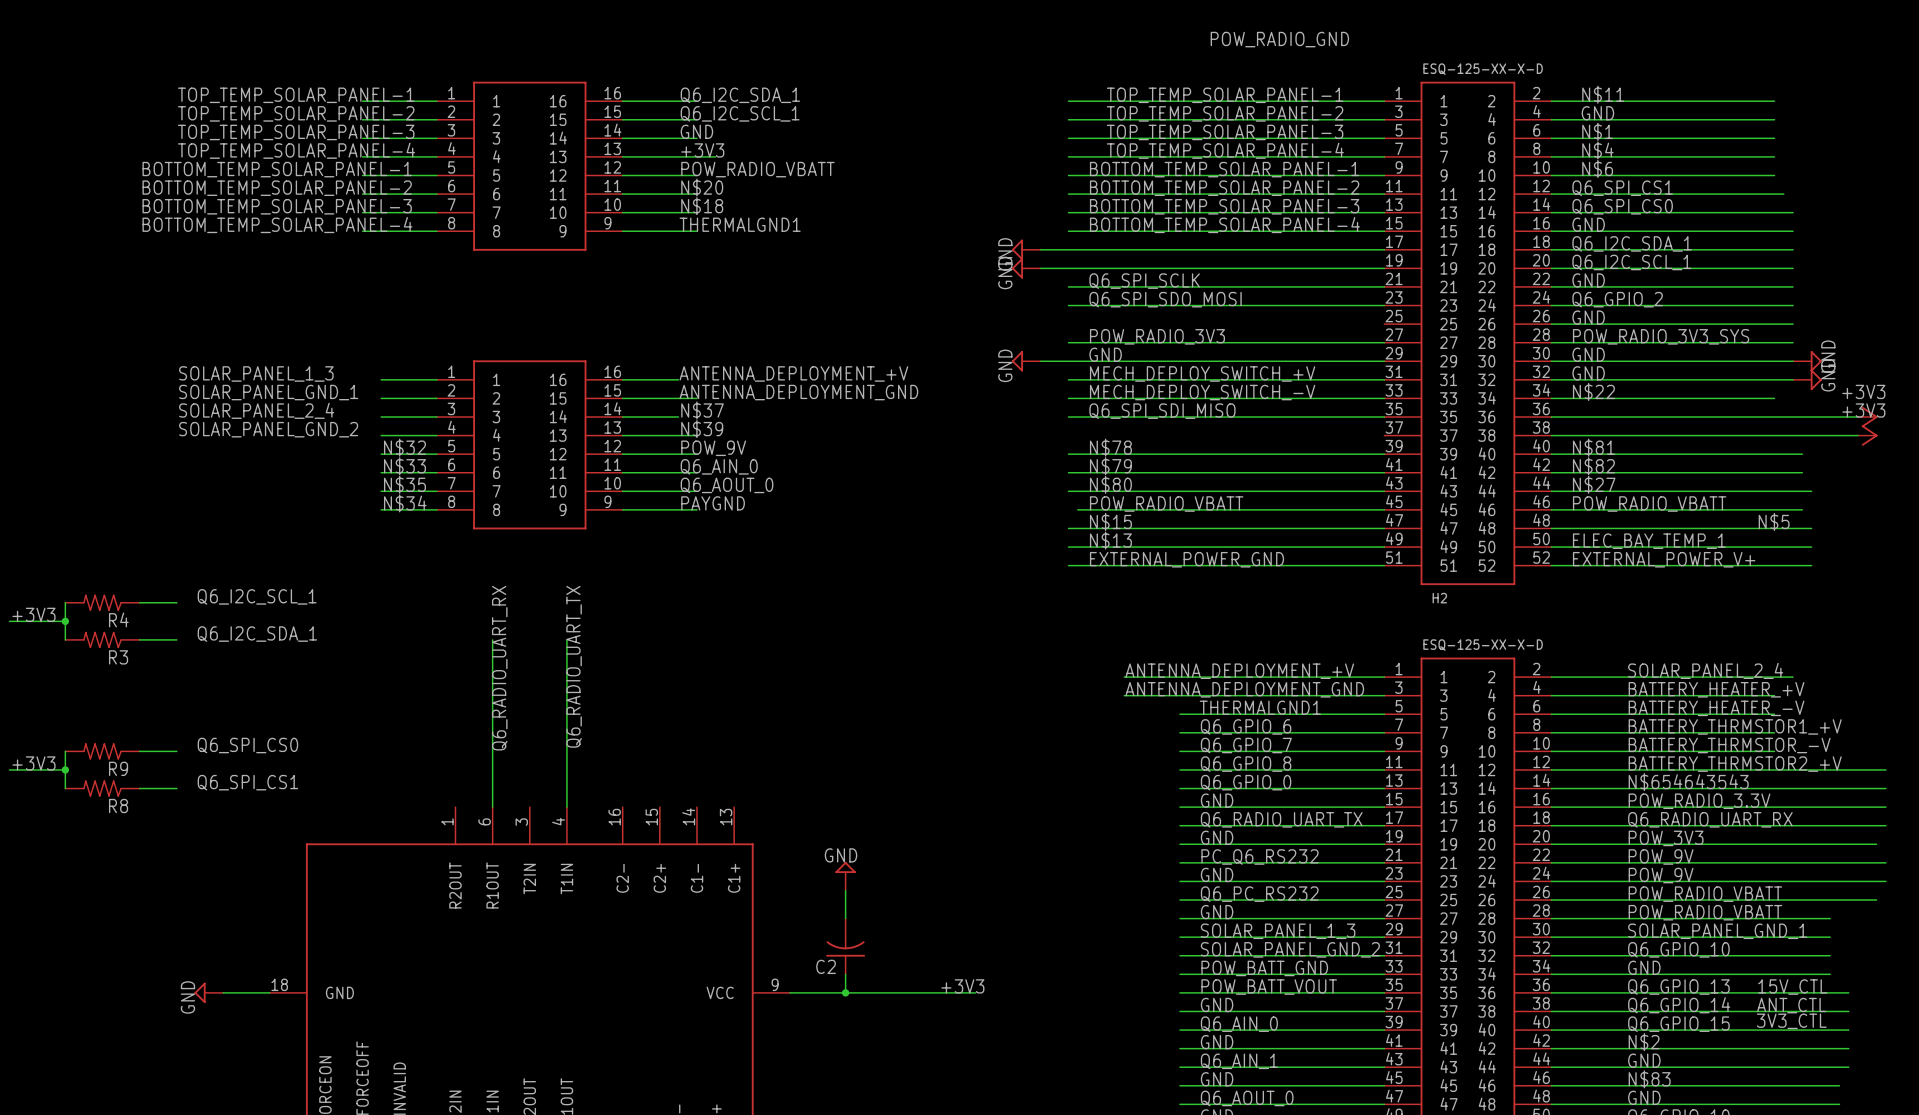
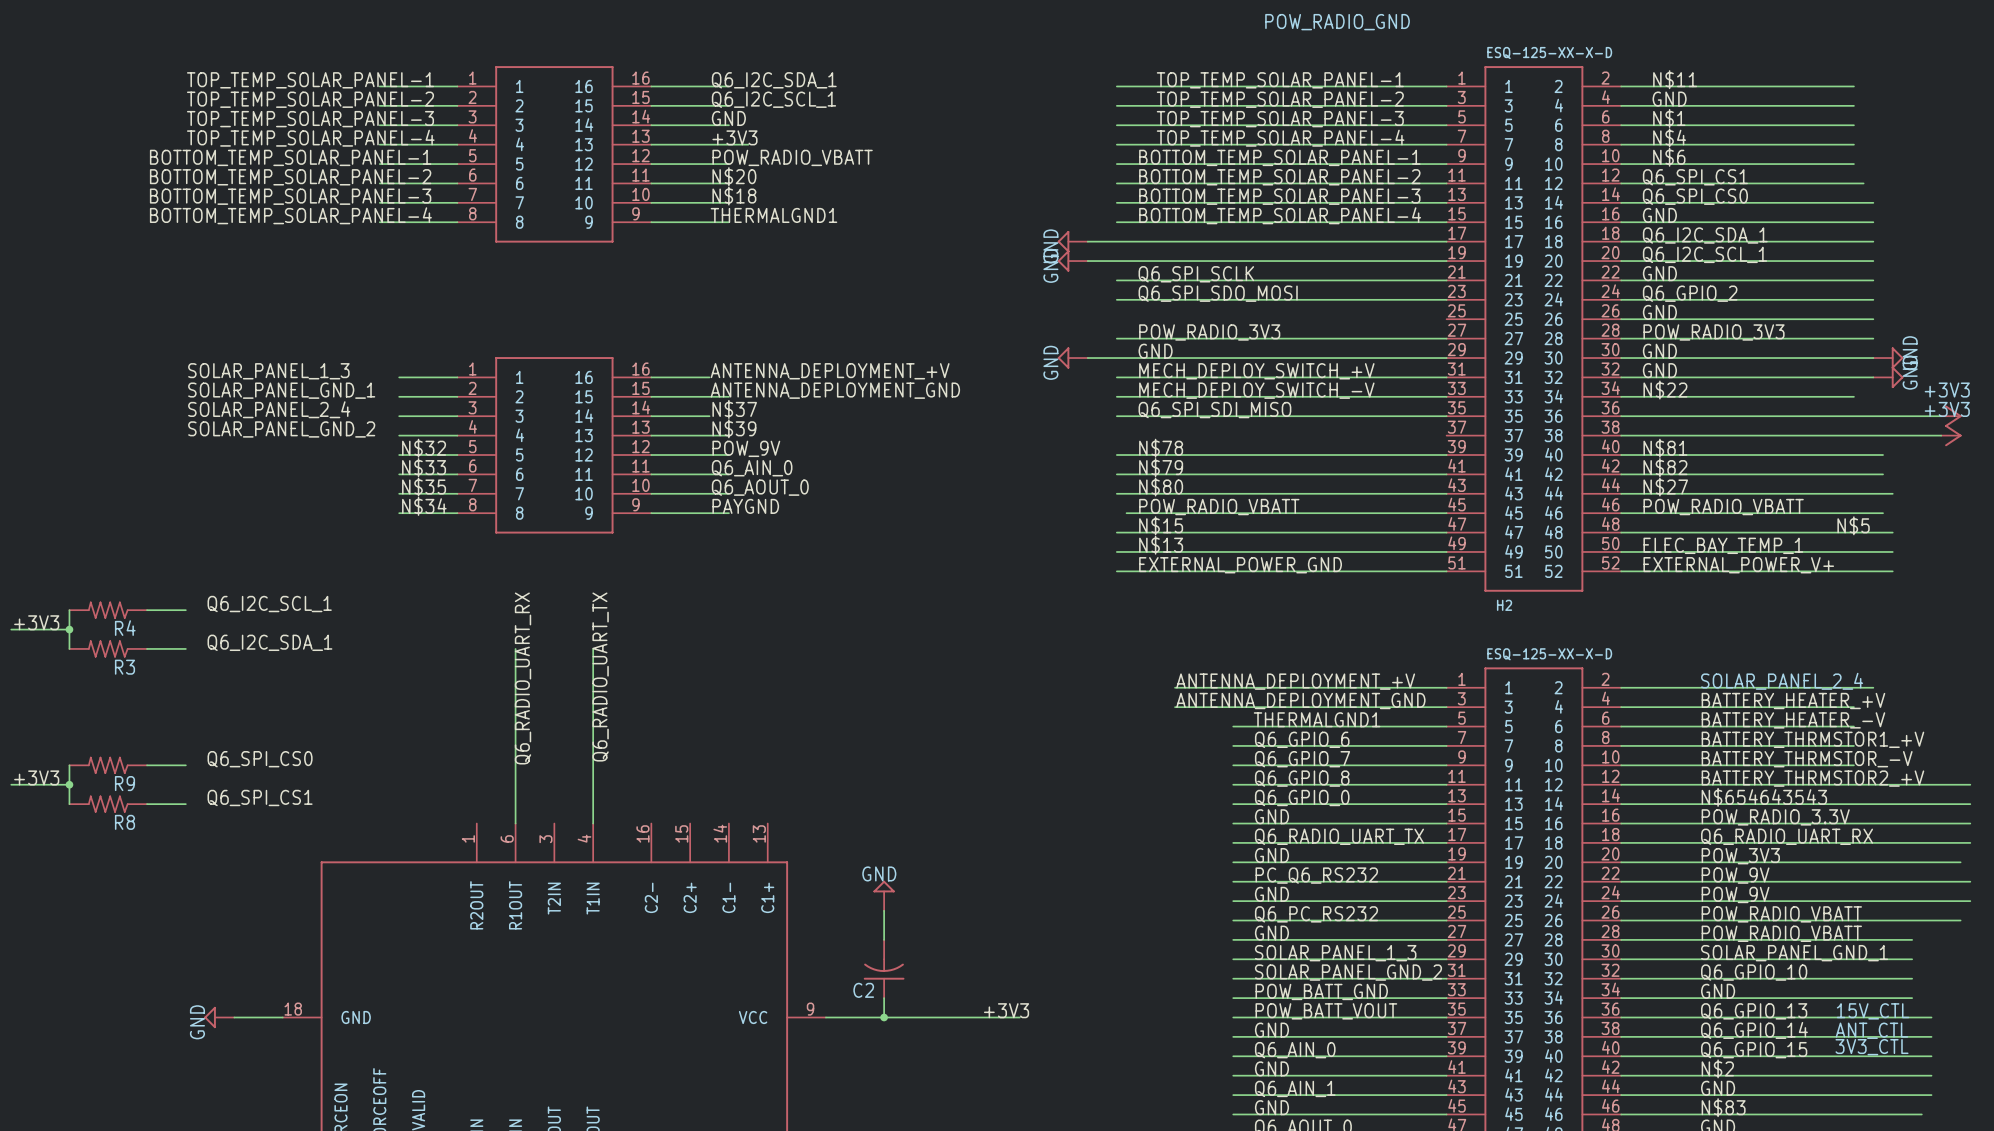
label: POW_RADIO_3V3_SYS (1661, 336) -> POW_RADIO_3V3 (1714, 332)

